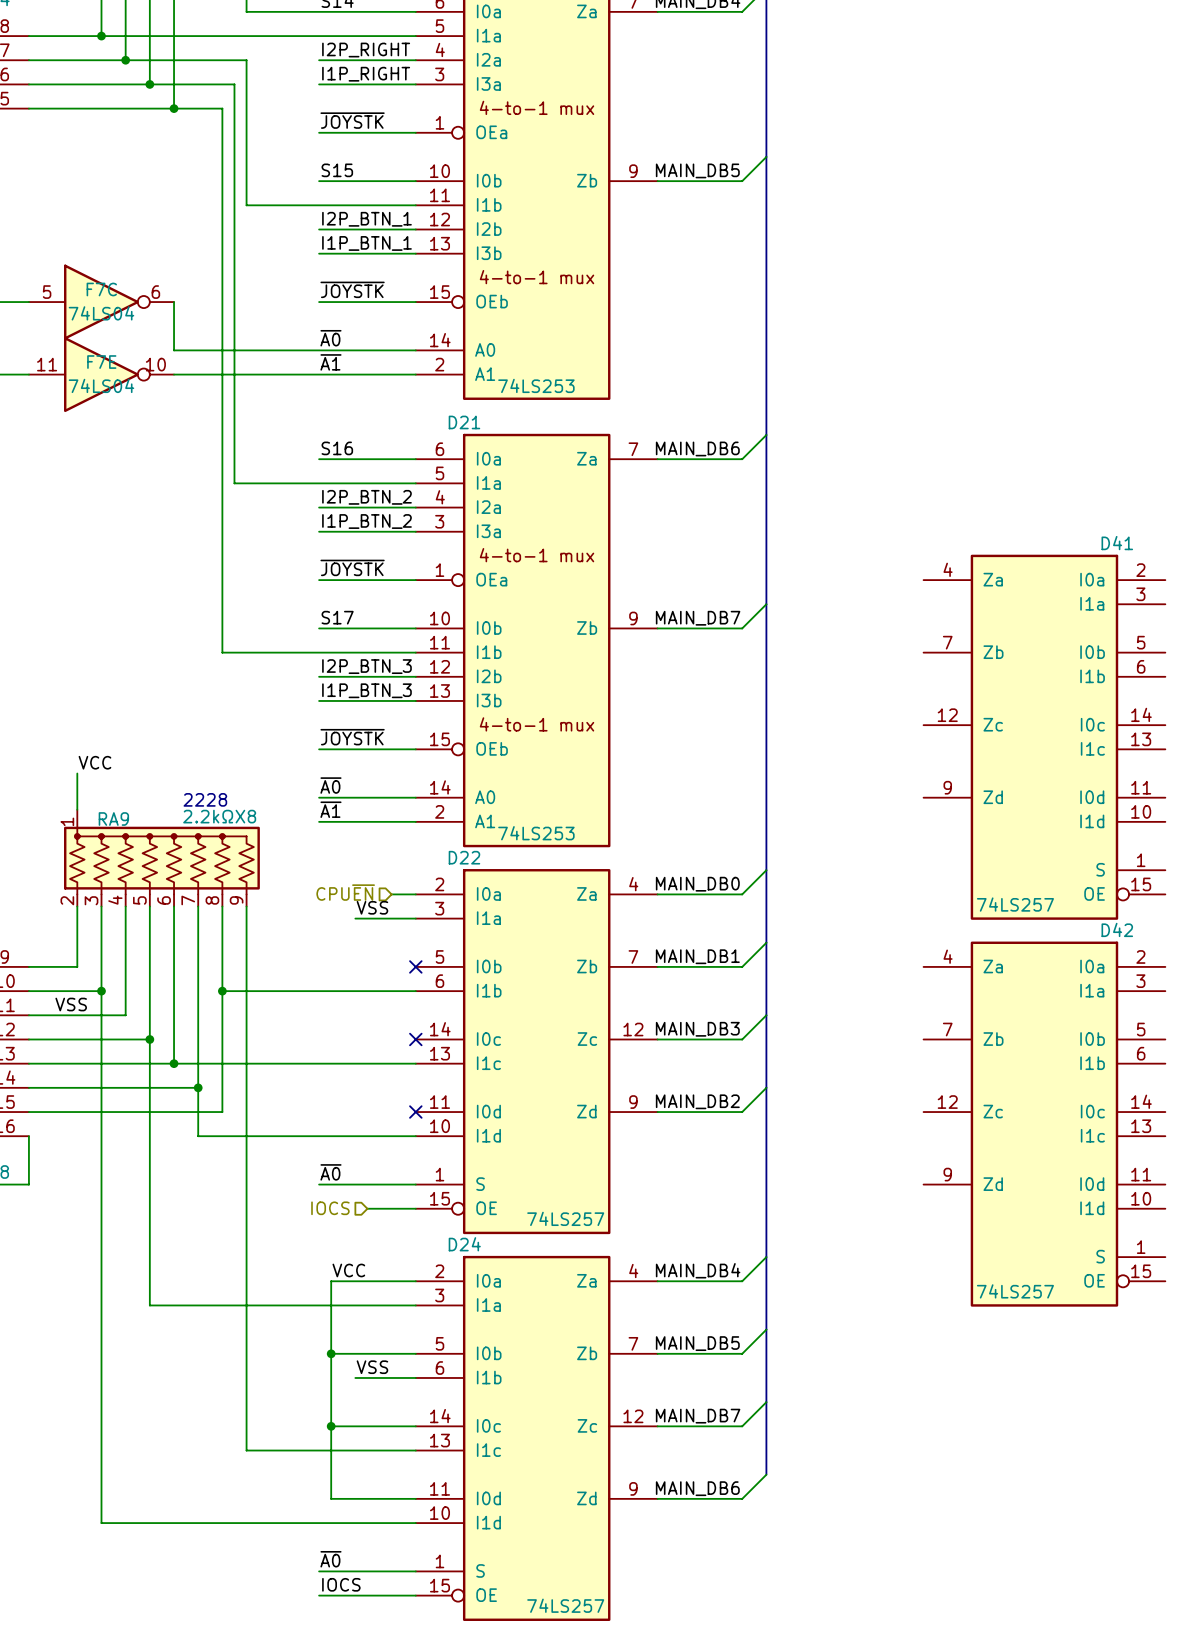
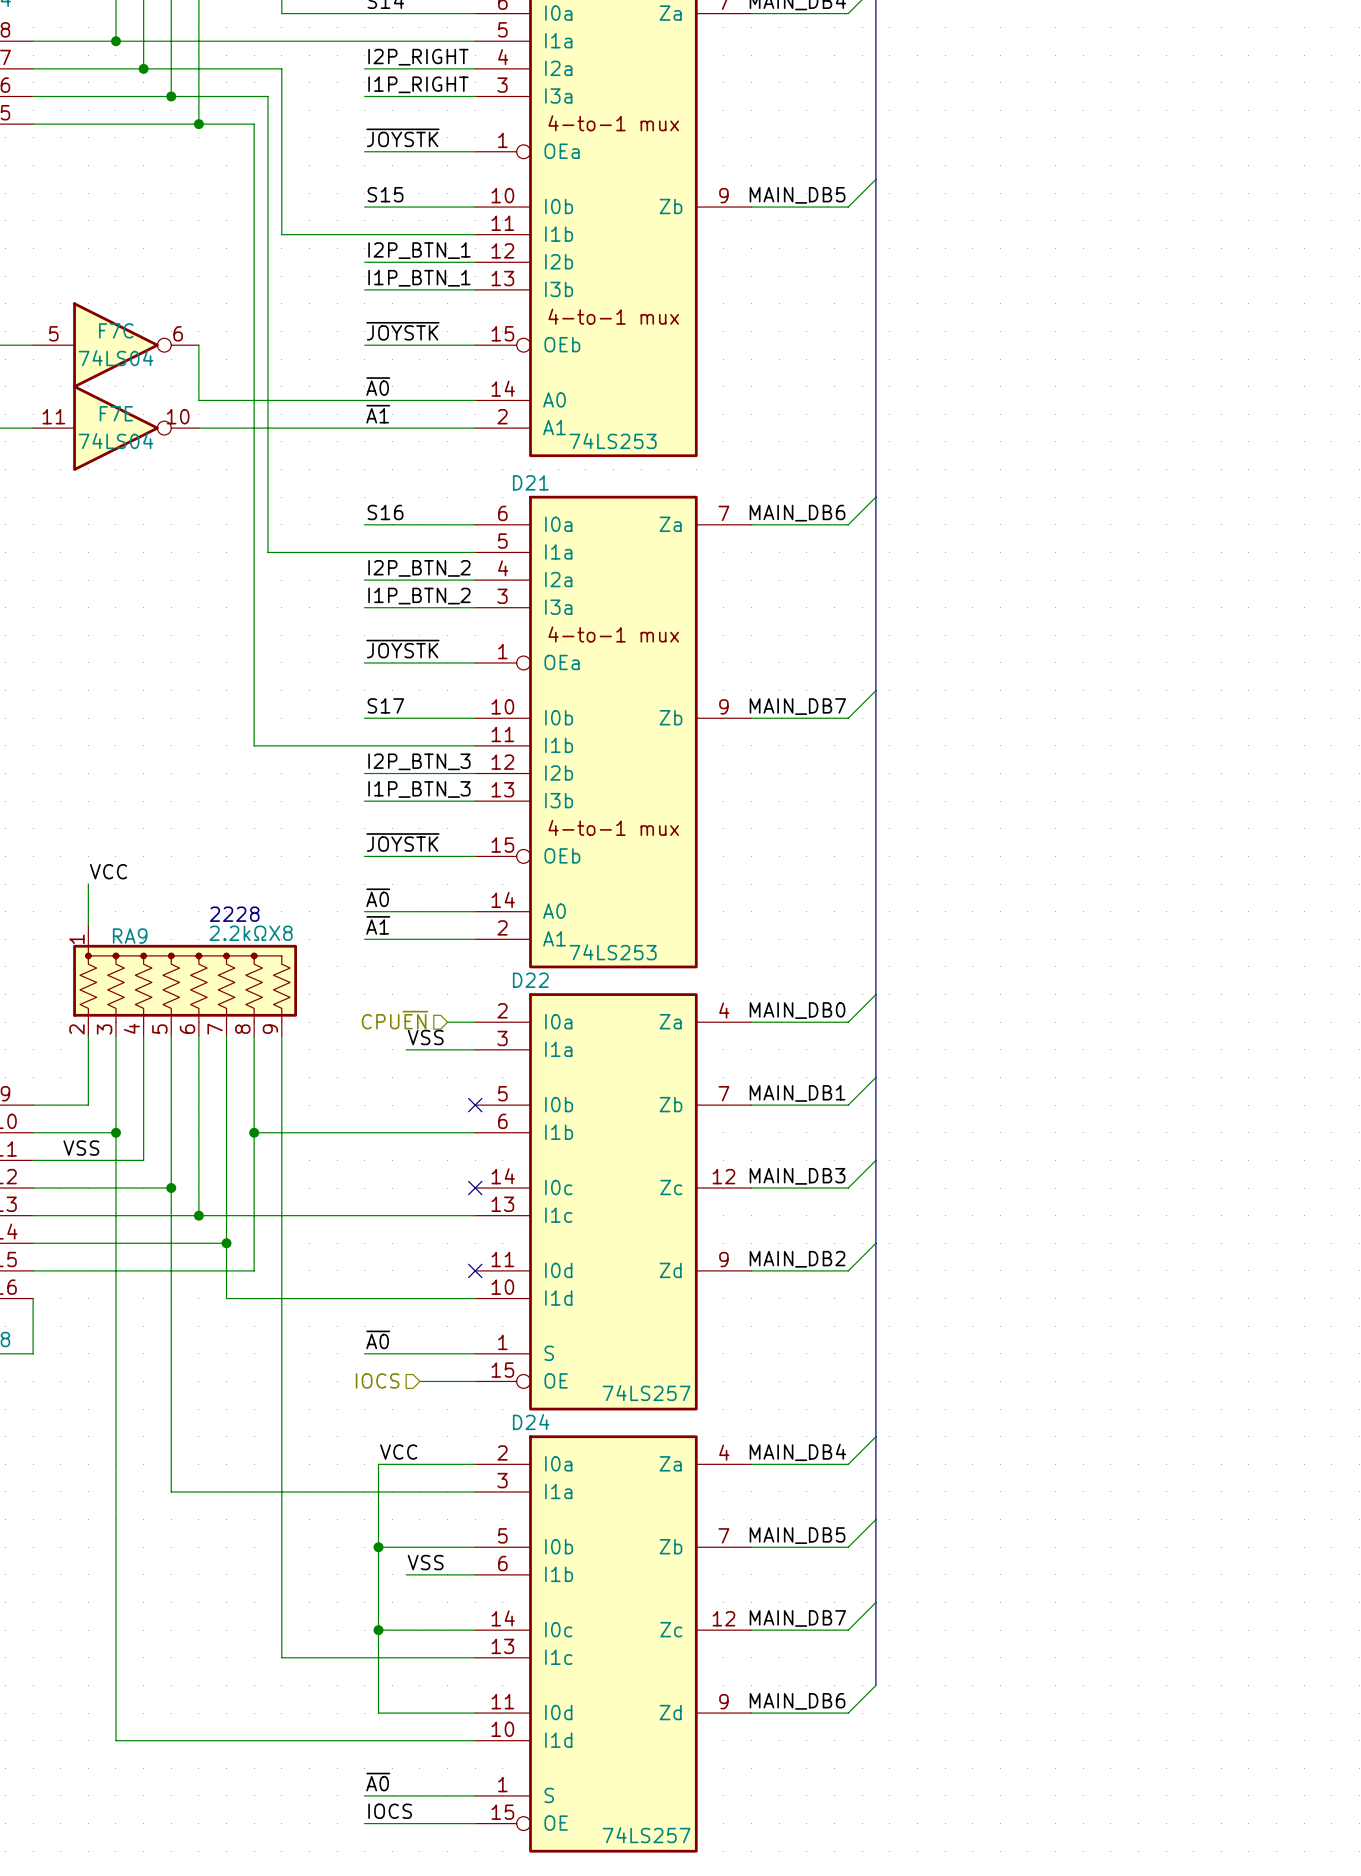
D41: 74LS257 (1044, 737) -> none
D42: 74LS257 (1044, 1124) -> none

